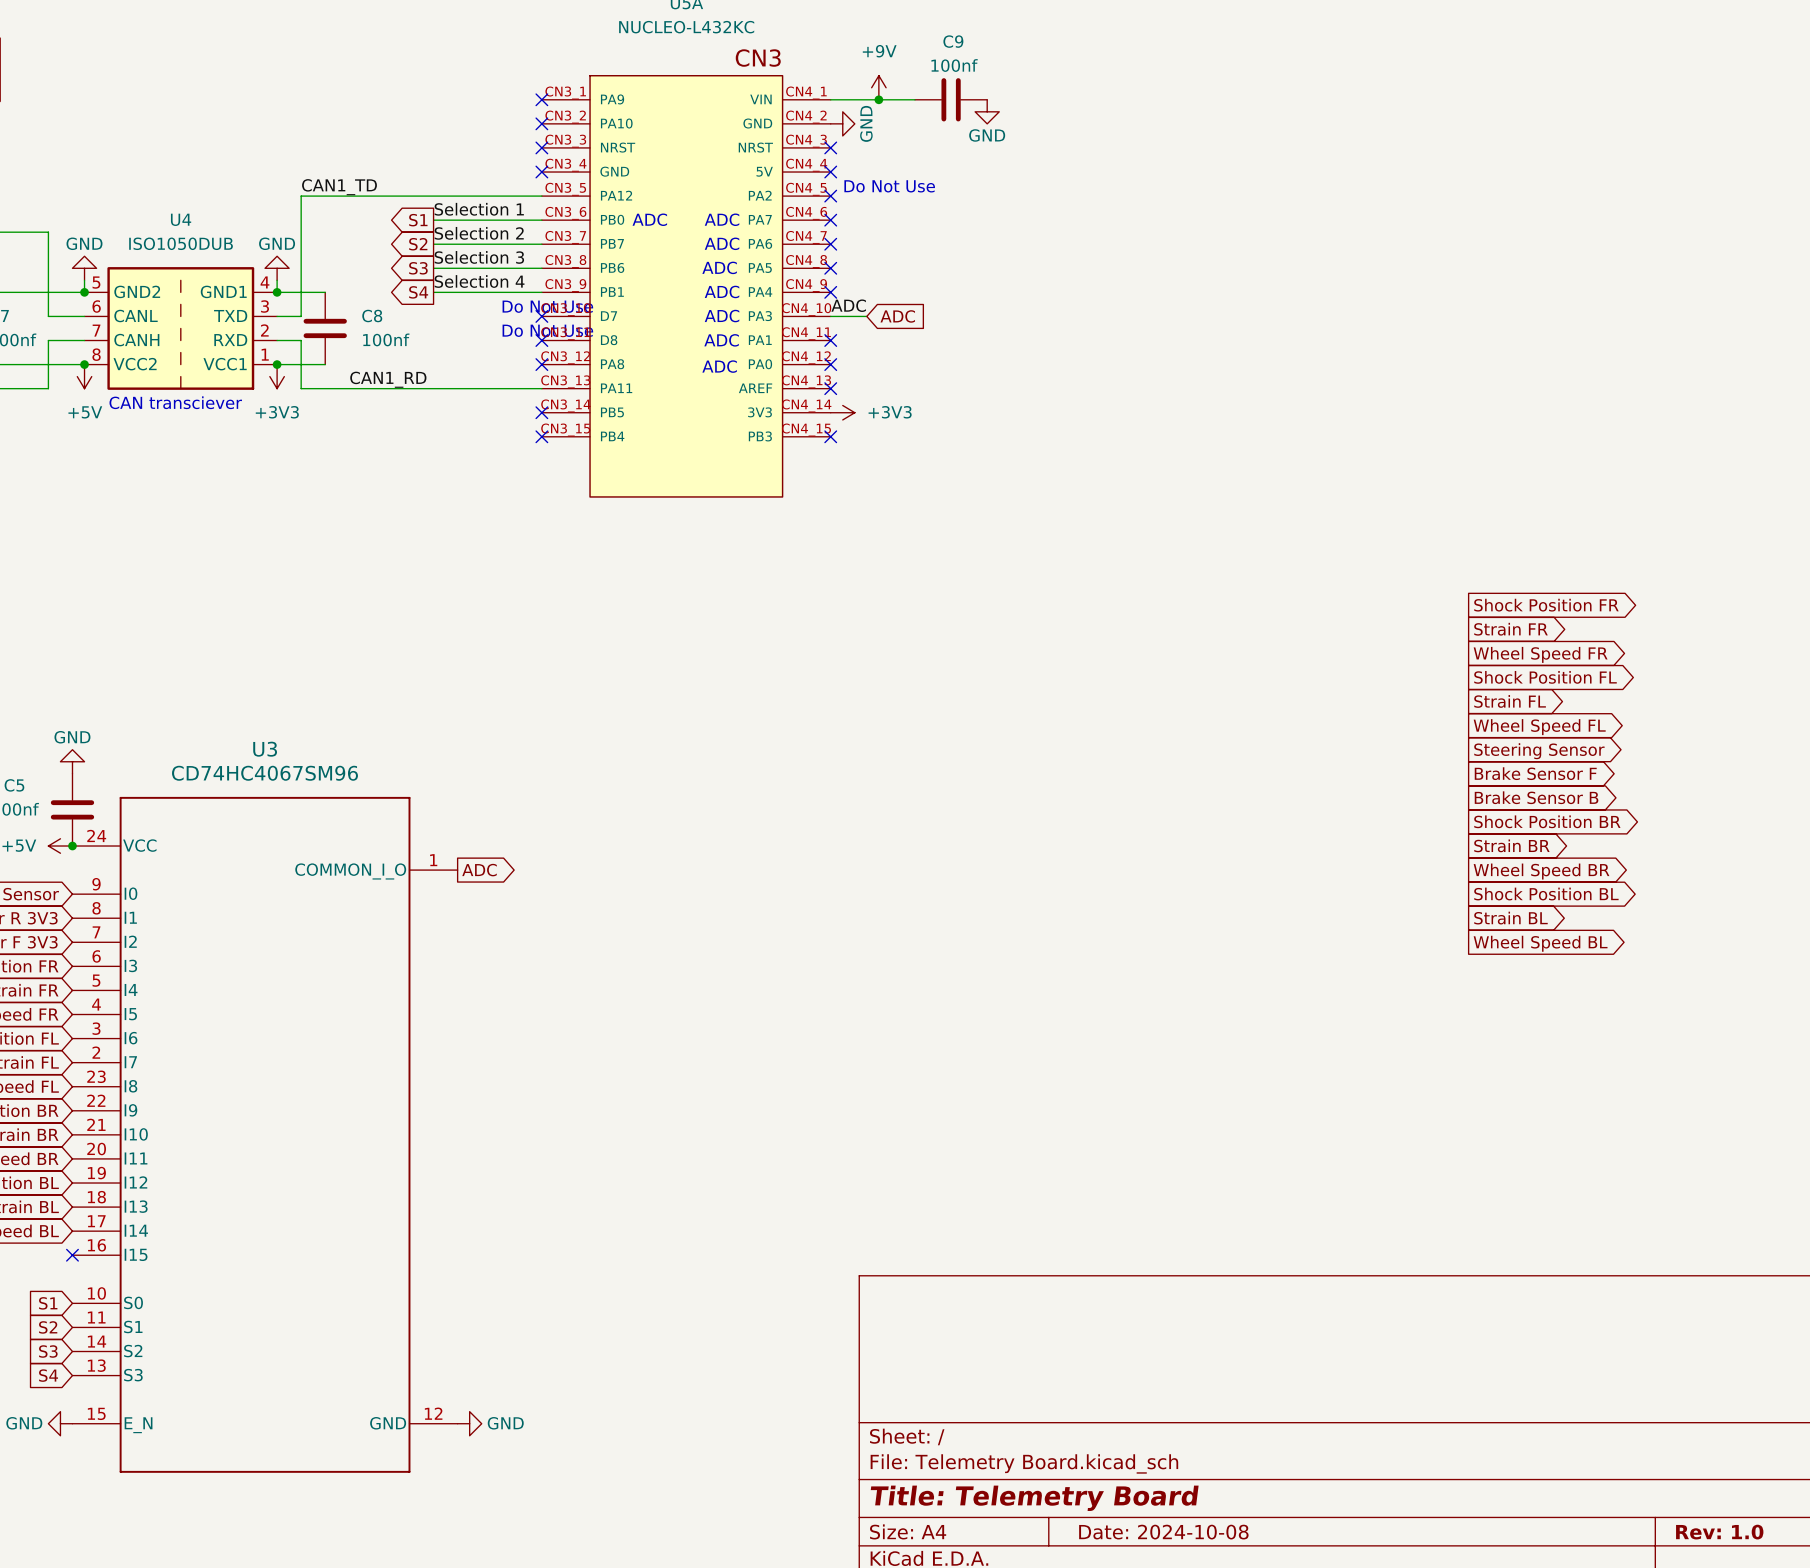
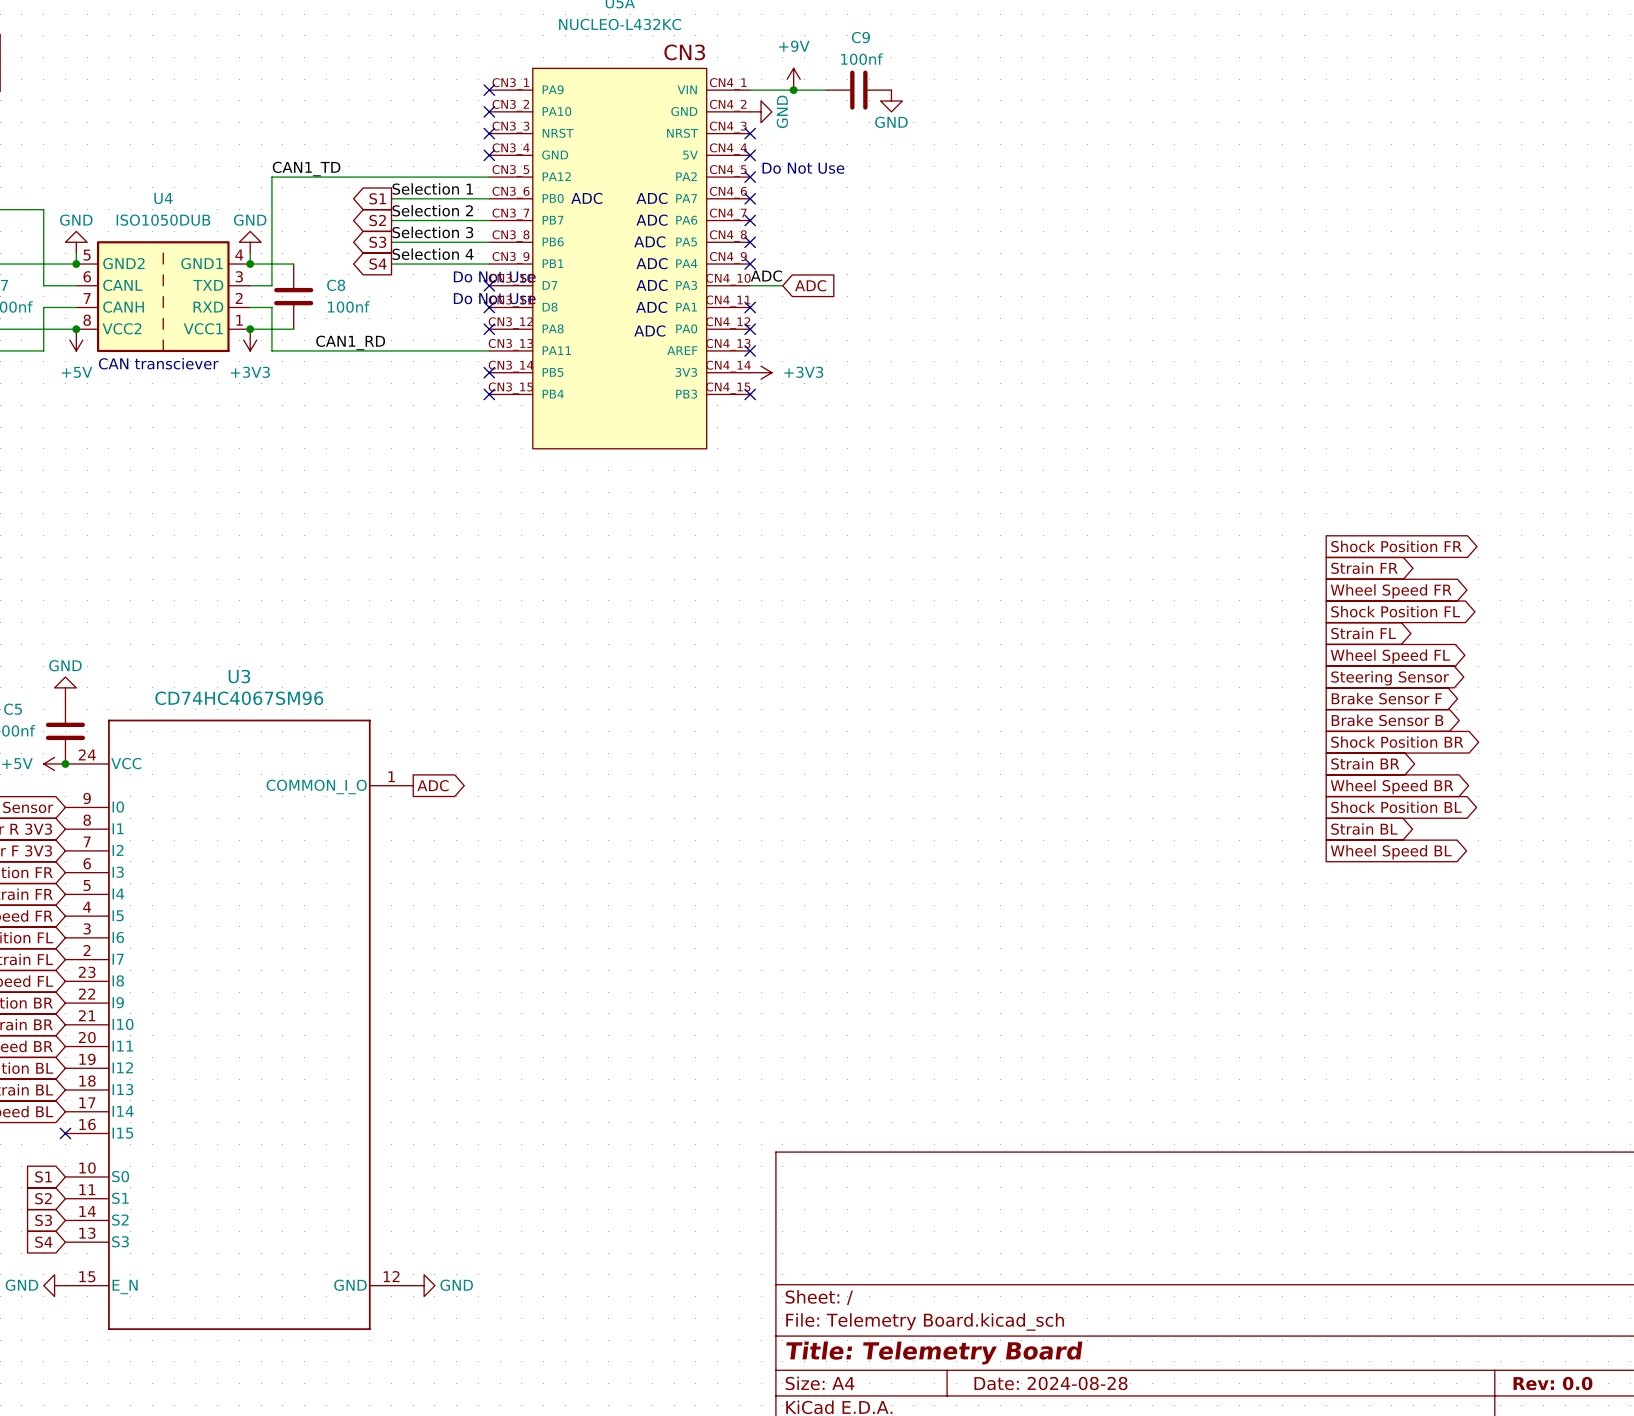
title block: Date: 2024-10-08 (1163, 1532) -> Date: 2024-08-28 (1050, 1383)
title block: Rev: 1.0 (1719, 1532) -> Rev: 0.0 (1552, 1383)

